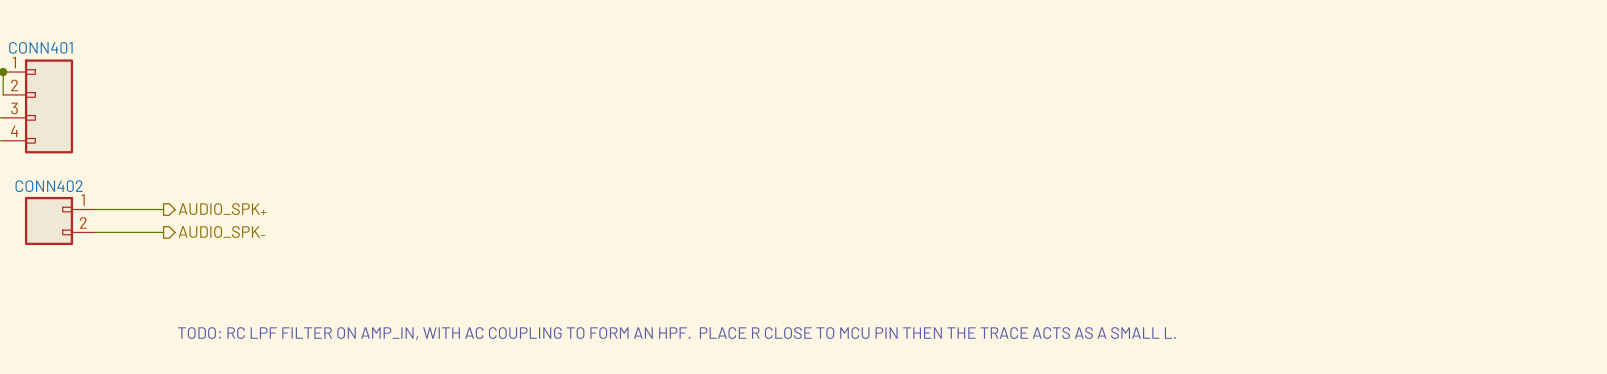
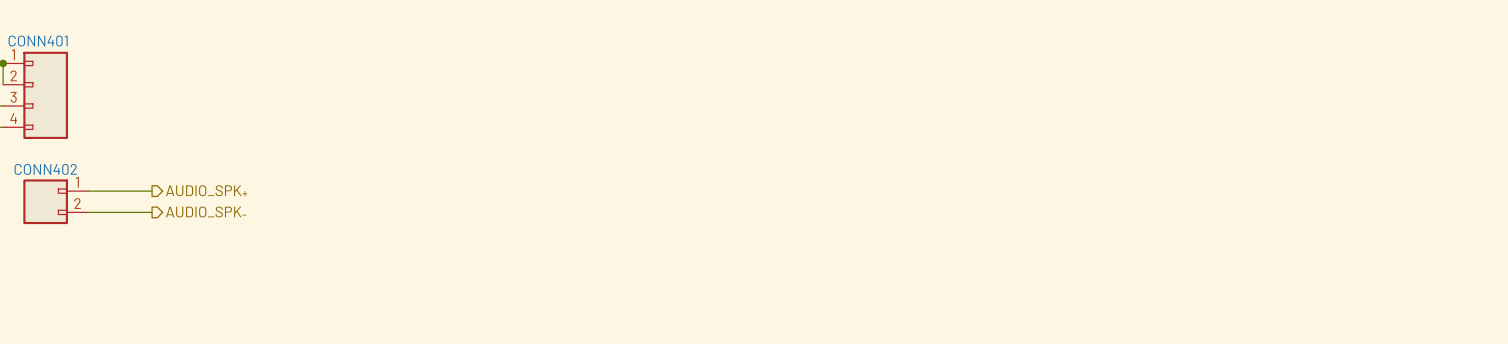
text: TODO: RC LPF FILTER ON AMP_IN, WITH AC COUPLING TO FORM AN HPF. PLACE R CLOSE TO MCU PIN THEN THE TRACE ACTS AS A SMALL L. (676, 333) -> none

